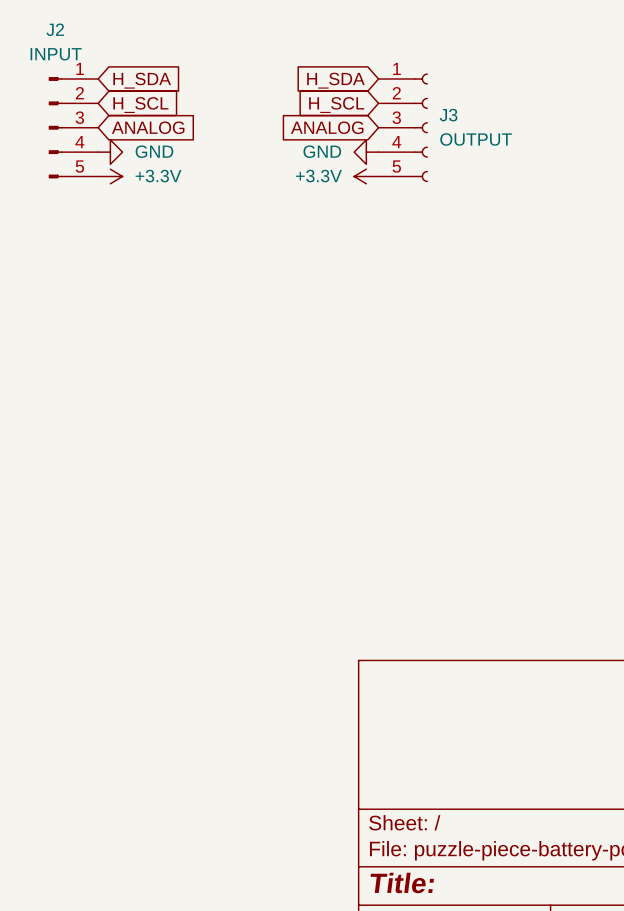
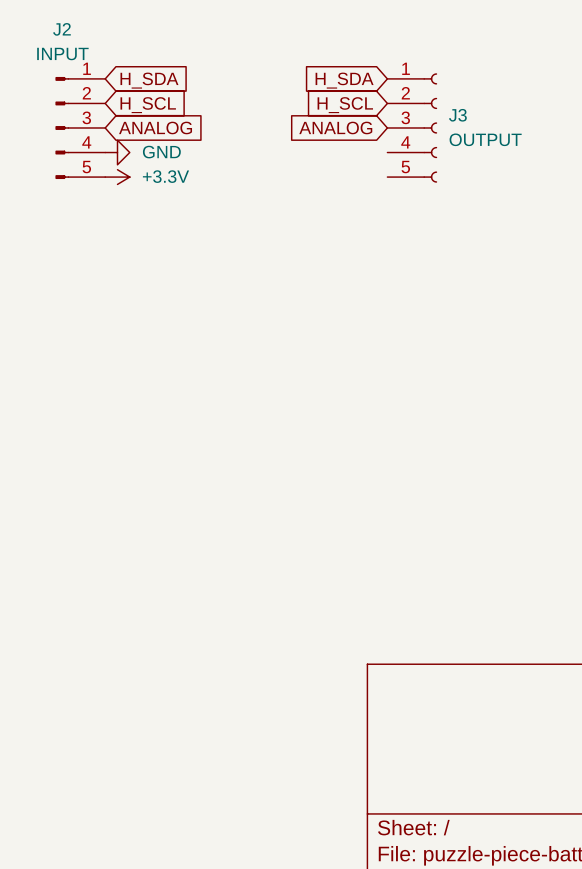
power symbol: GND (366, 152) -> none
power symbol: +3.3V (366, 176) -> none

